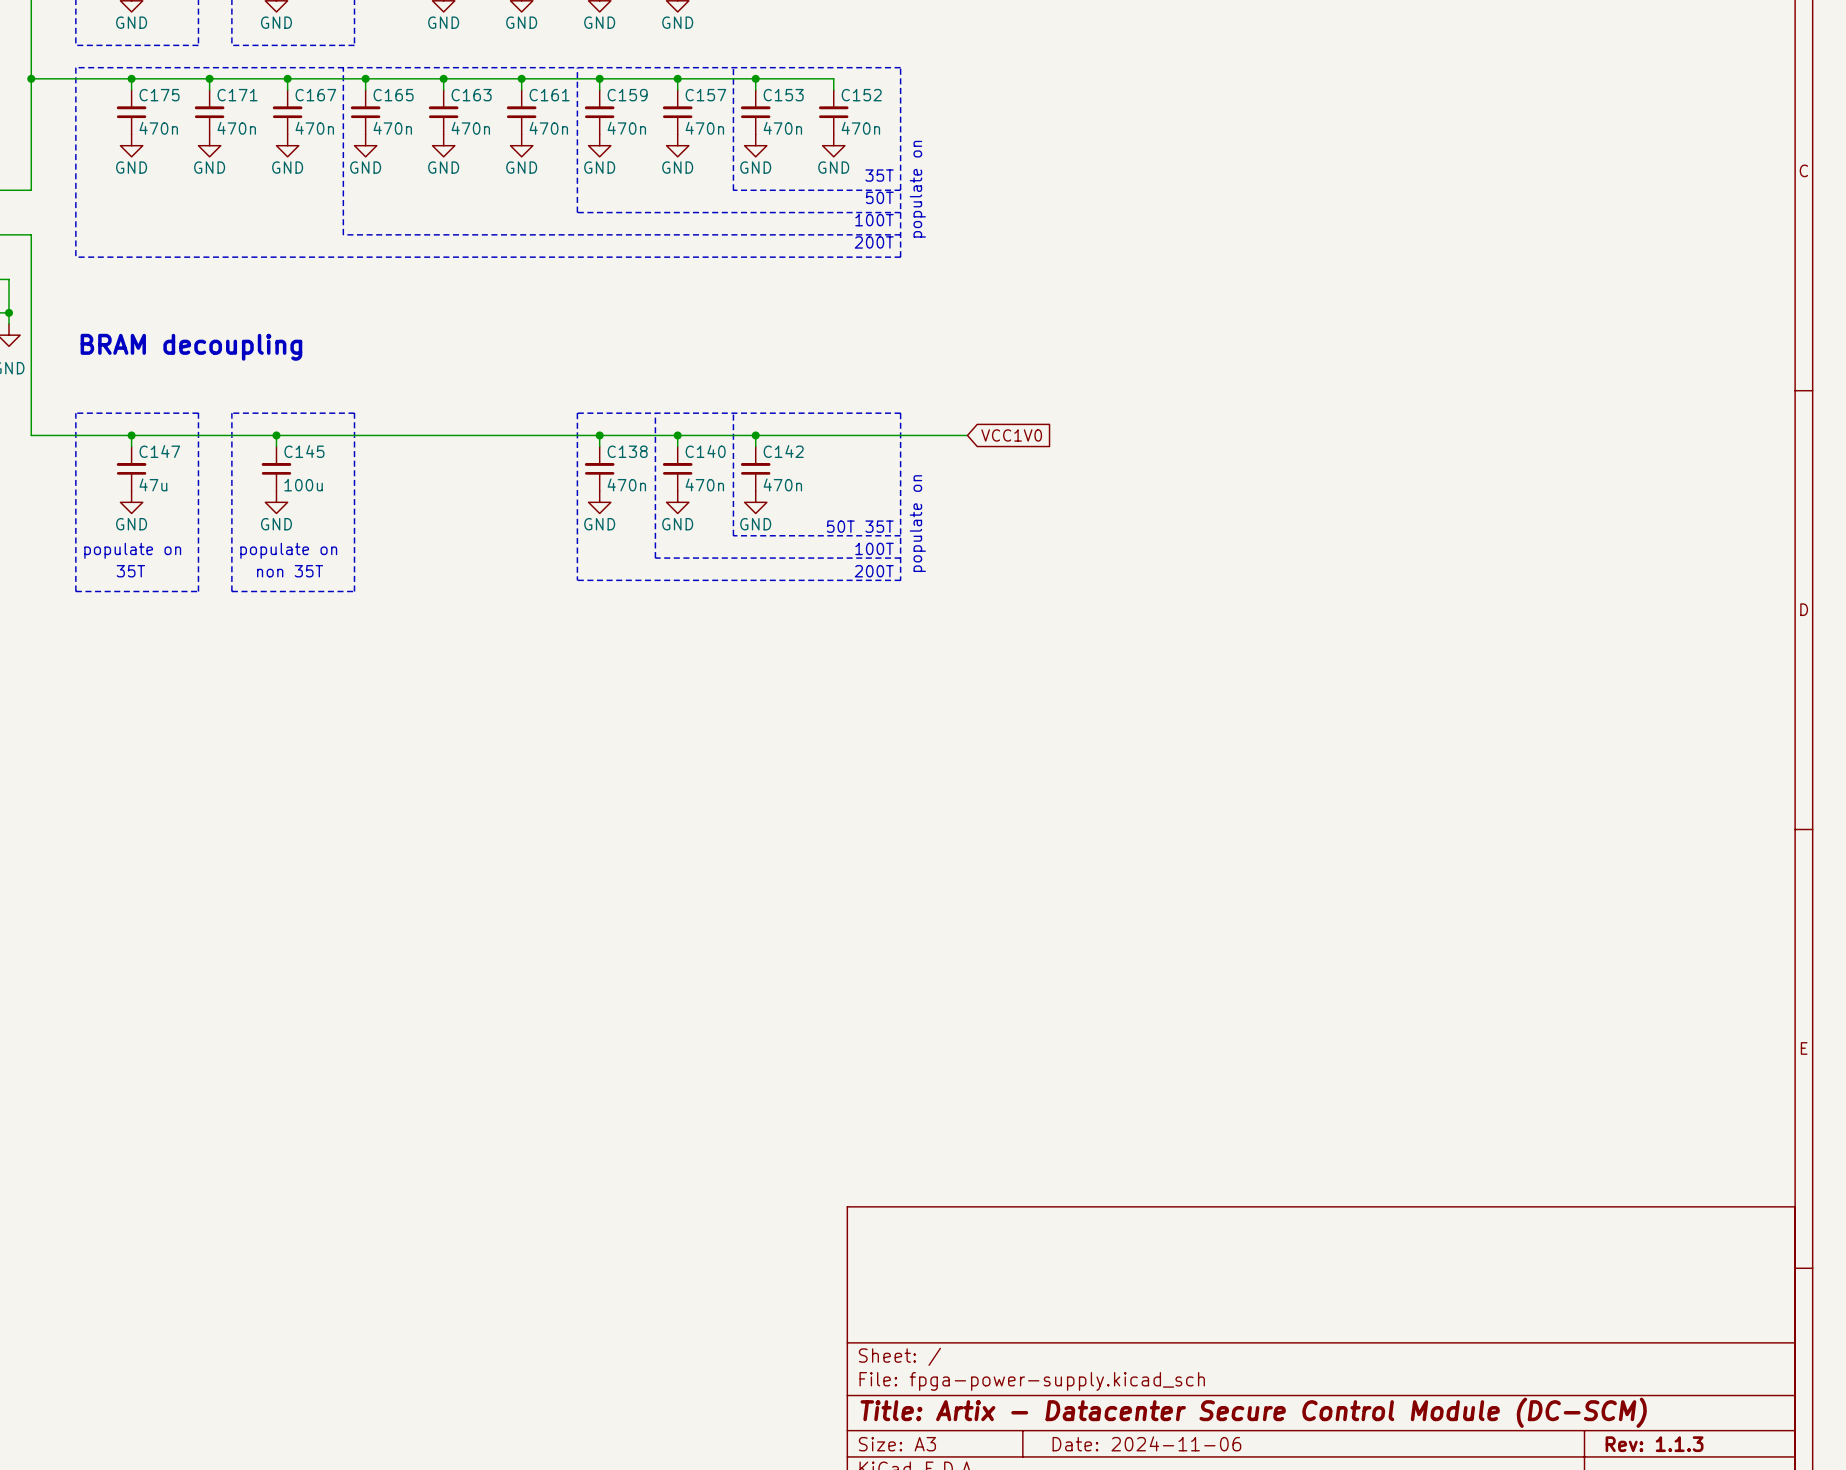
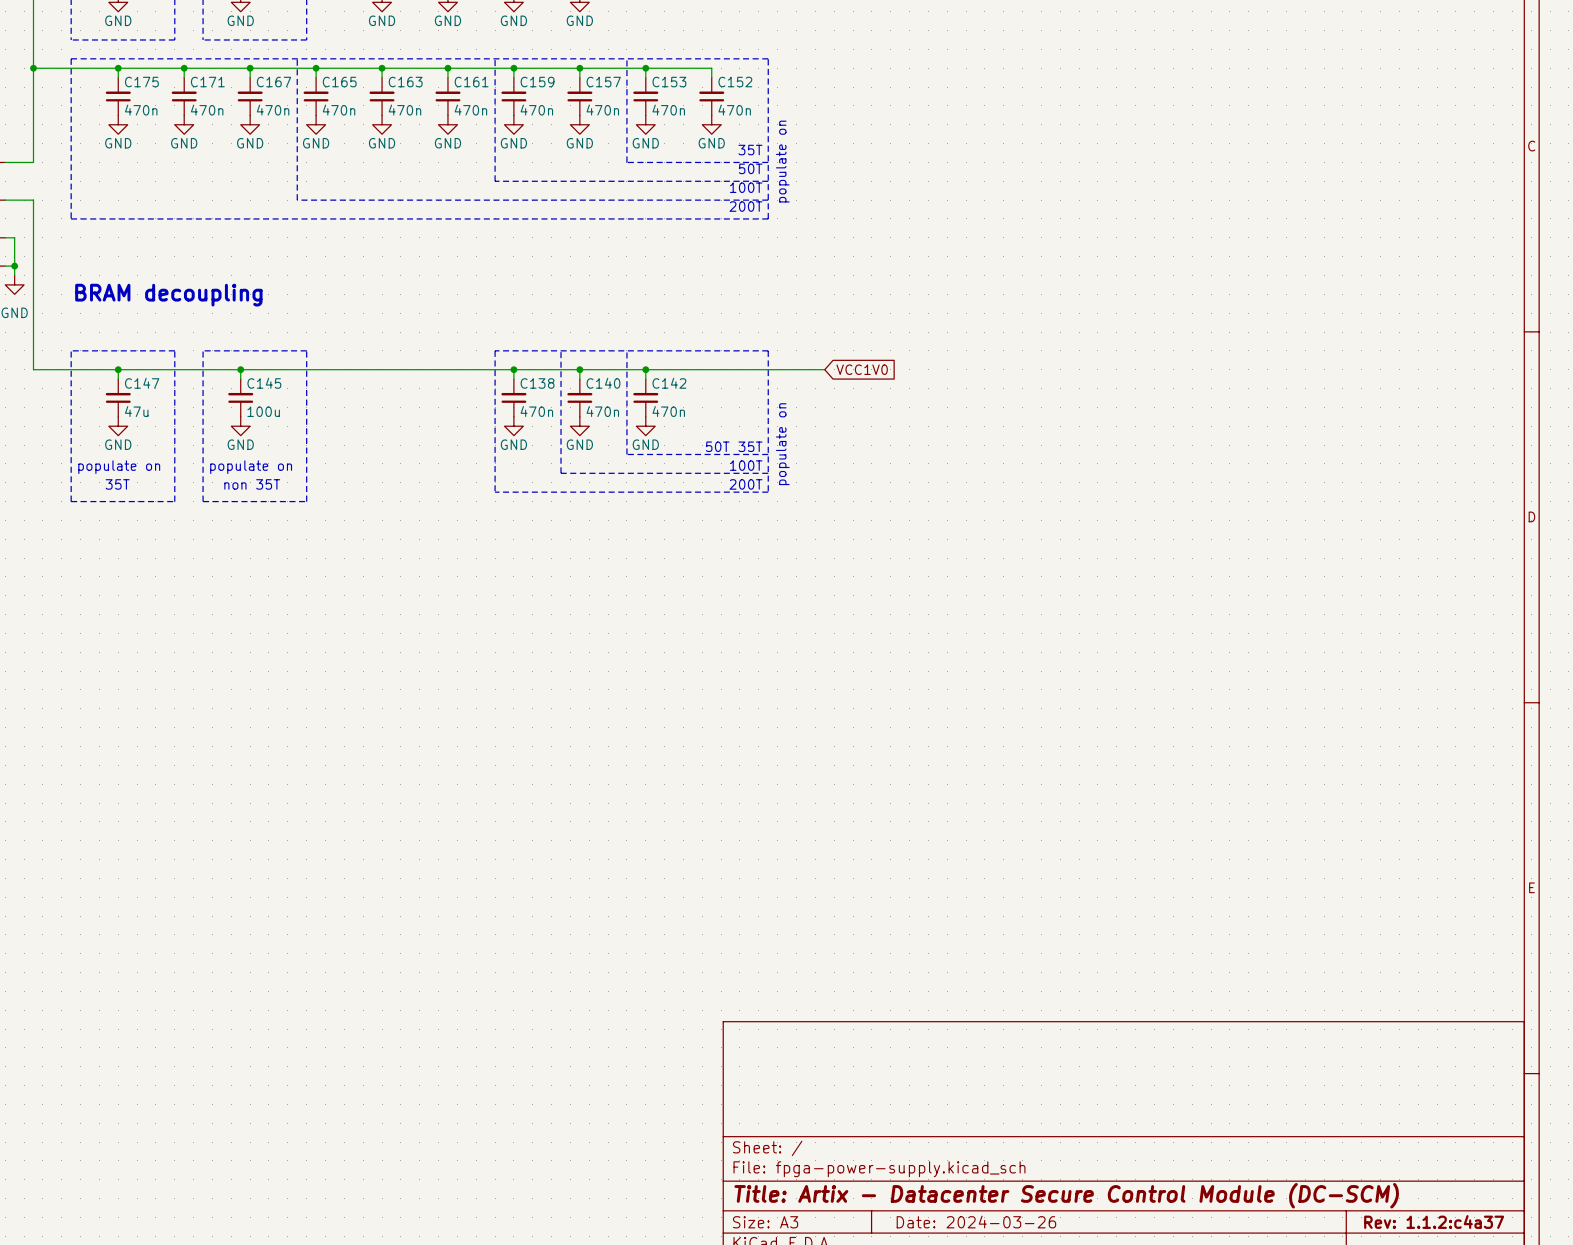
title block: Date: 2024-11-06 (1146, 1443) -> Date: 2024-03-26 (976, 1222)
title block: Rev: 1.1.3 (1654, 1444) -> Rev: 1.1.2:c4a37 (1434, 1222)

